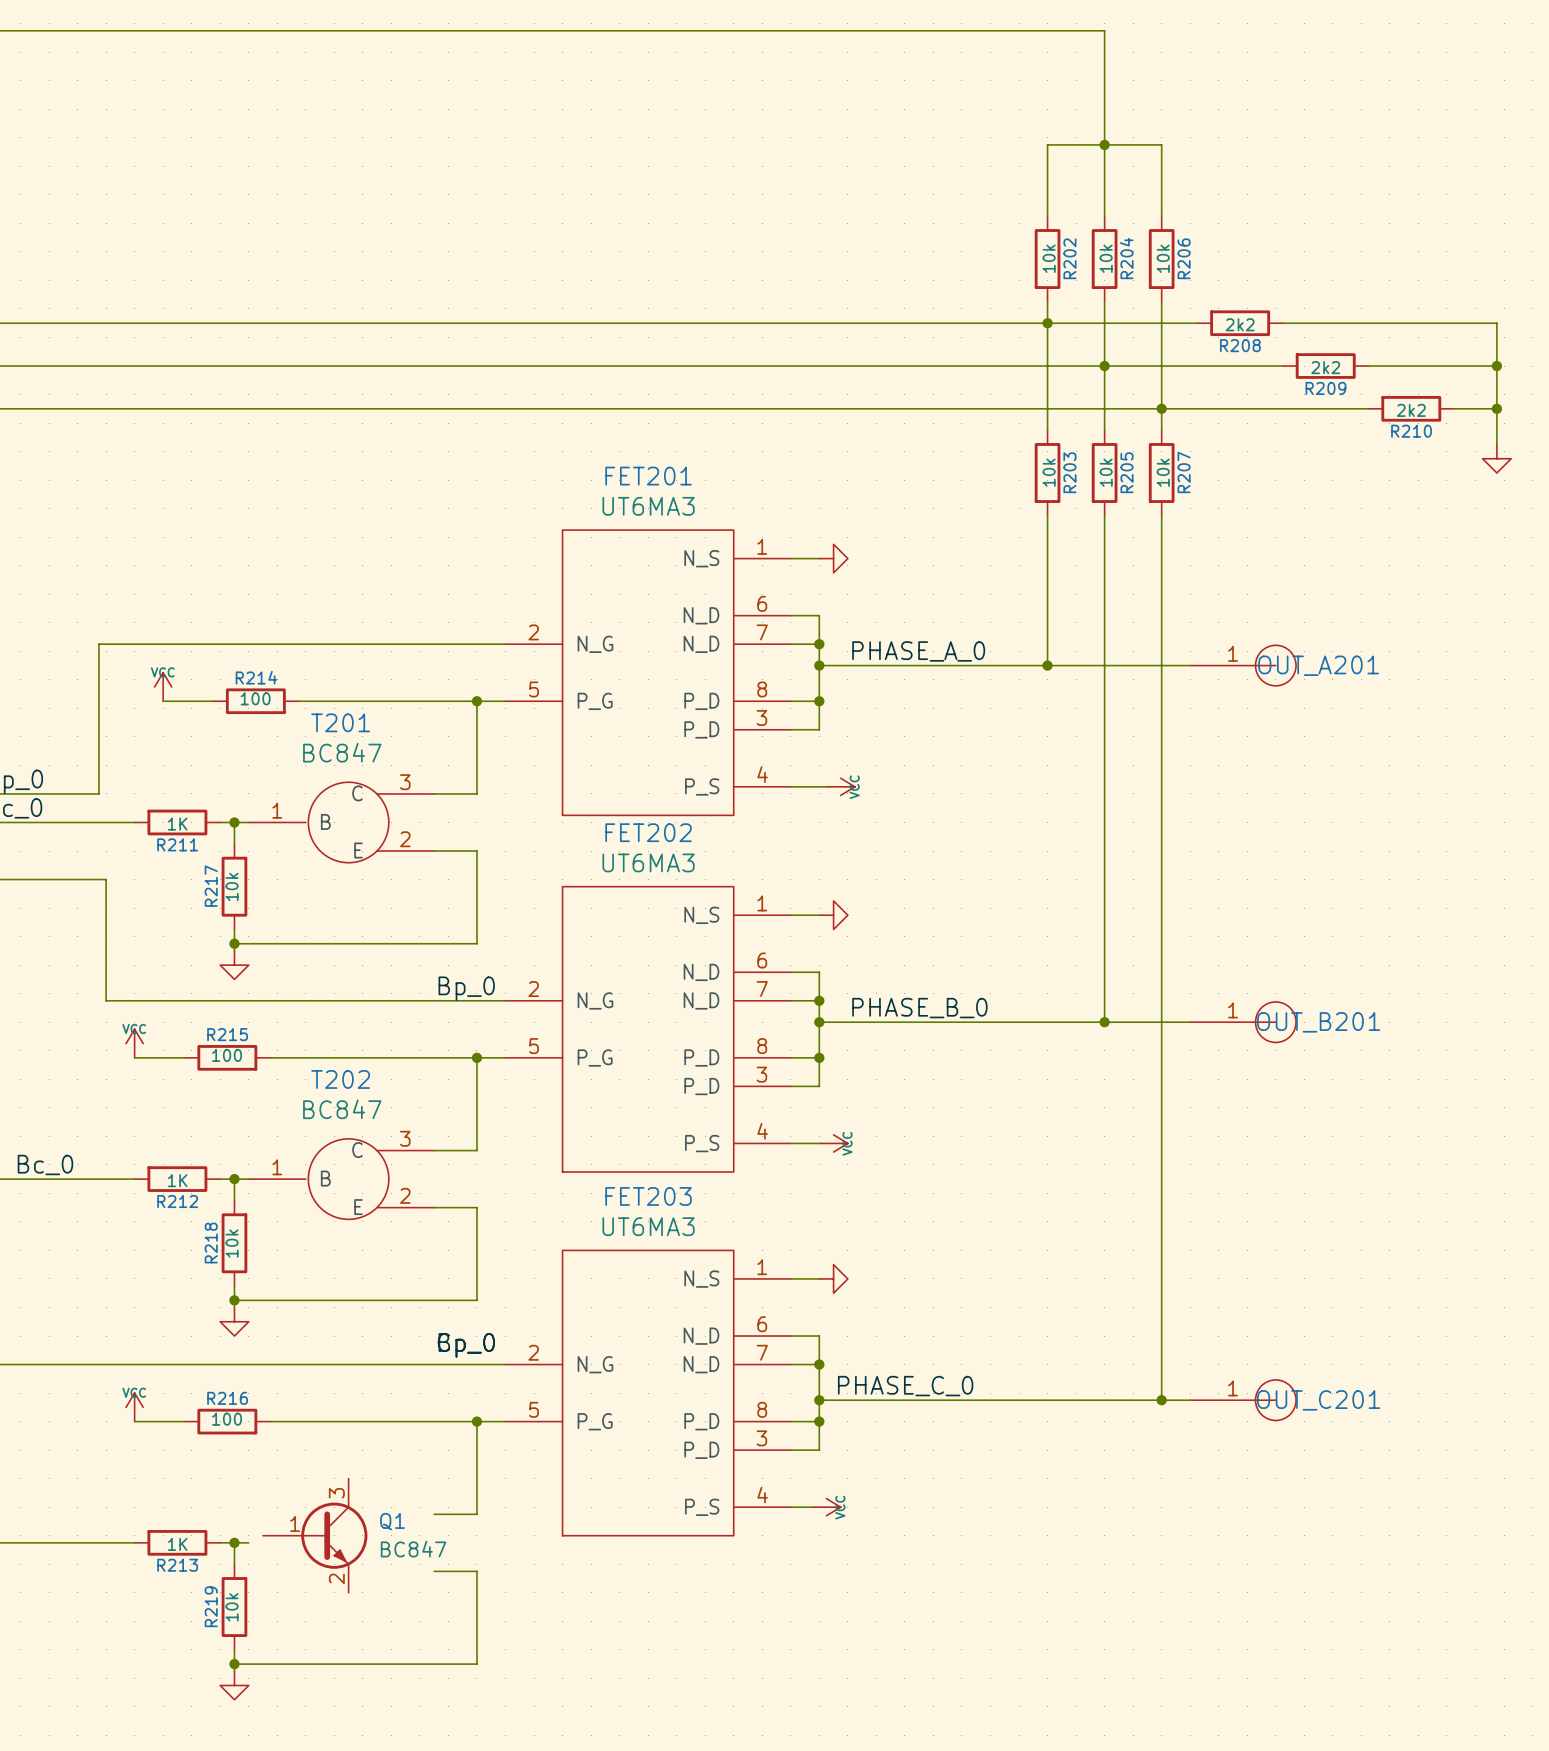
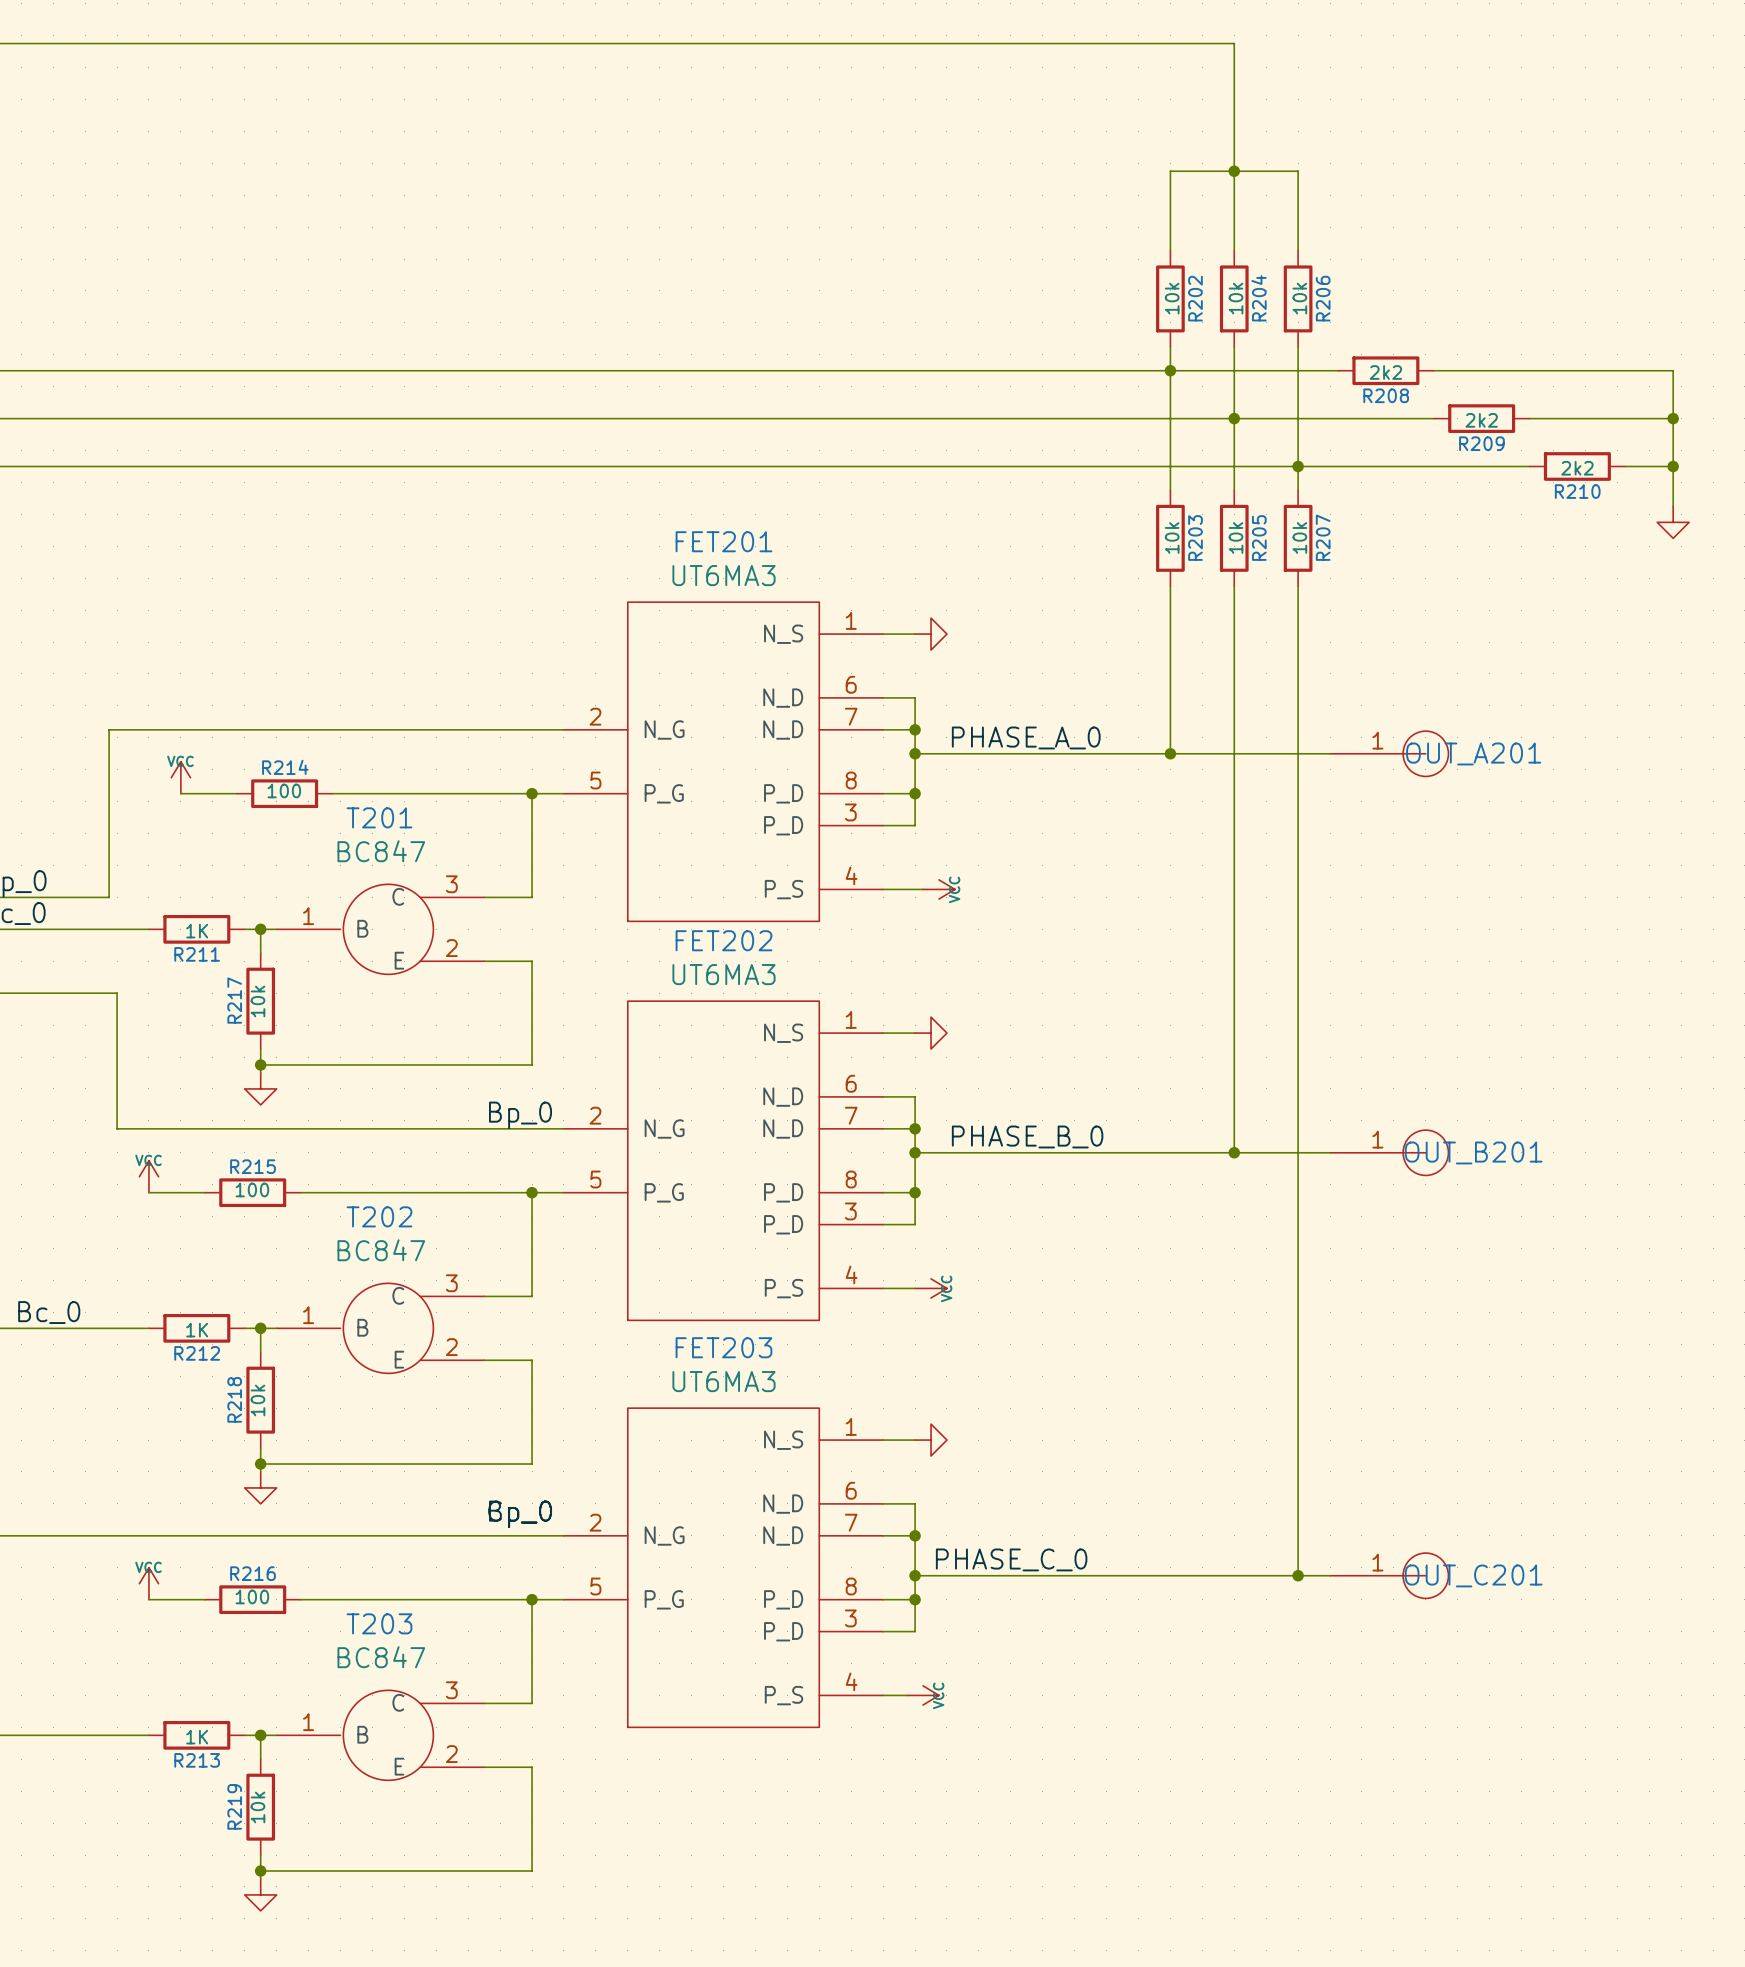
Q1: BC847 (315, 1535) -> none
T203: none -> BC847 (380, 1735)

